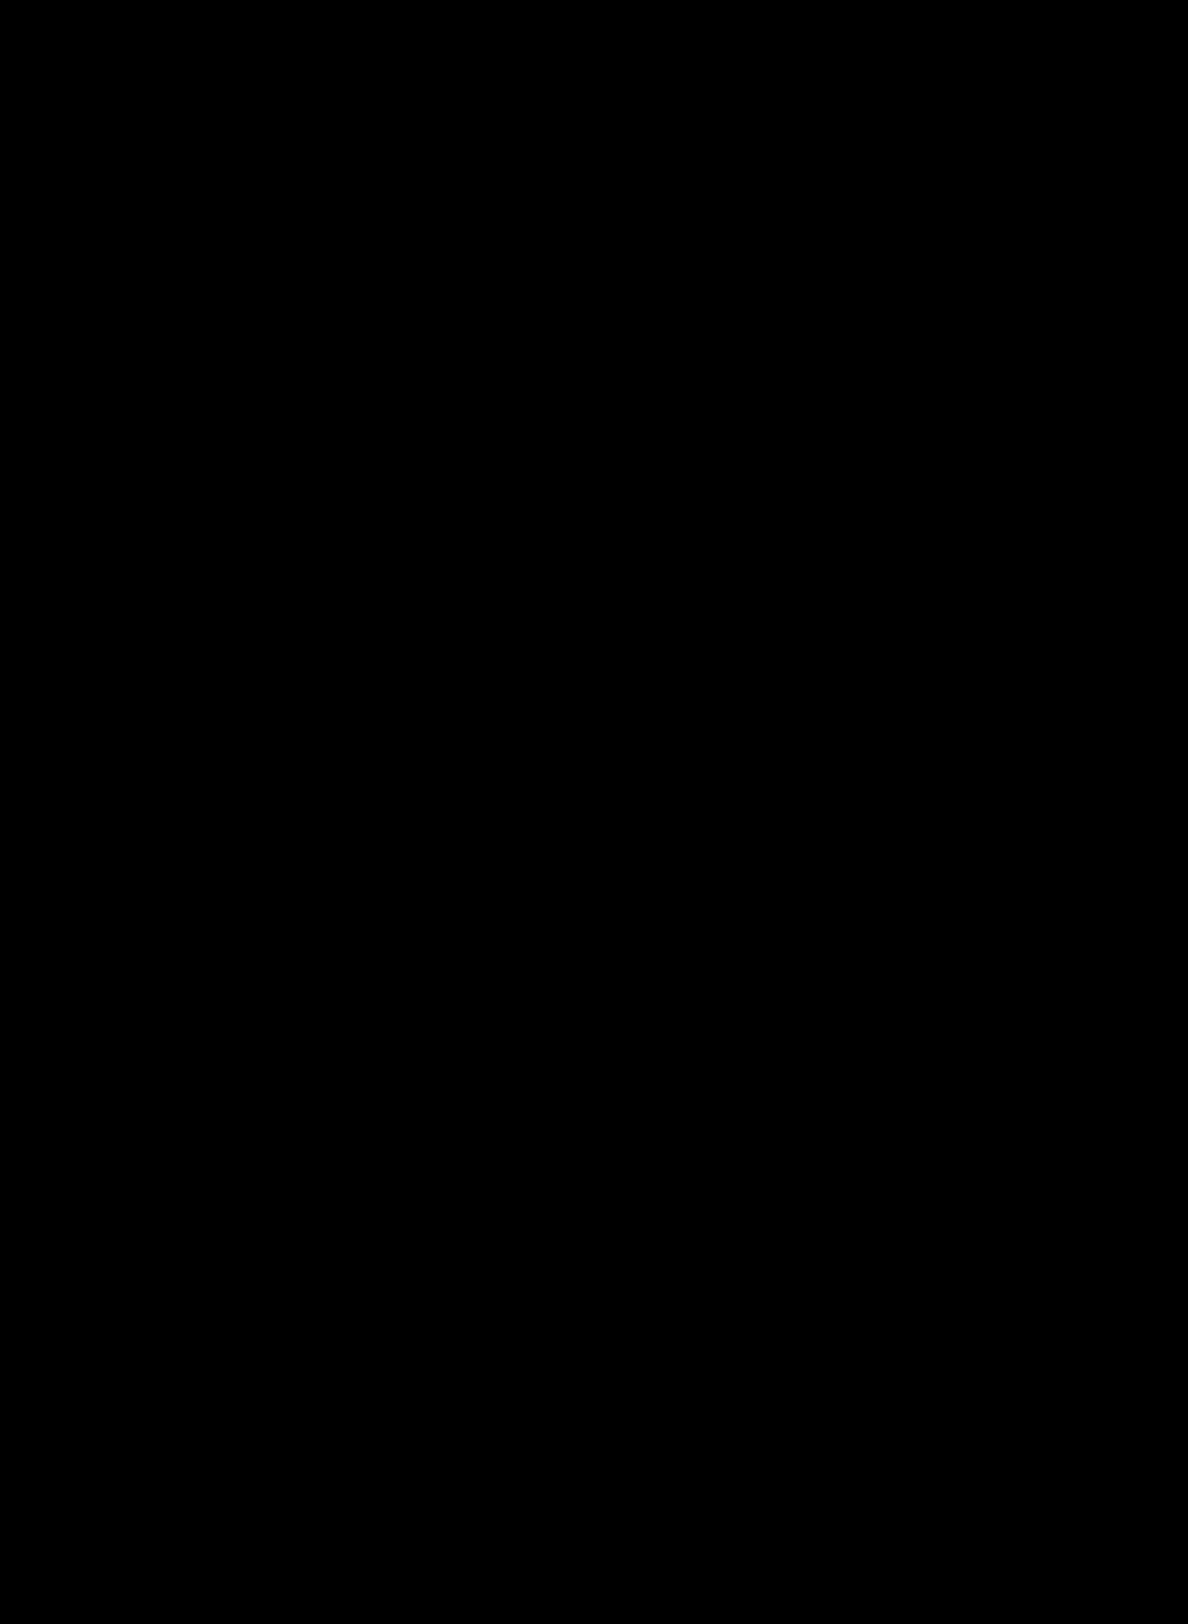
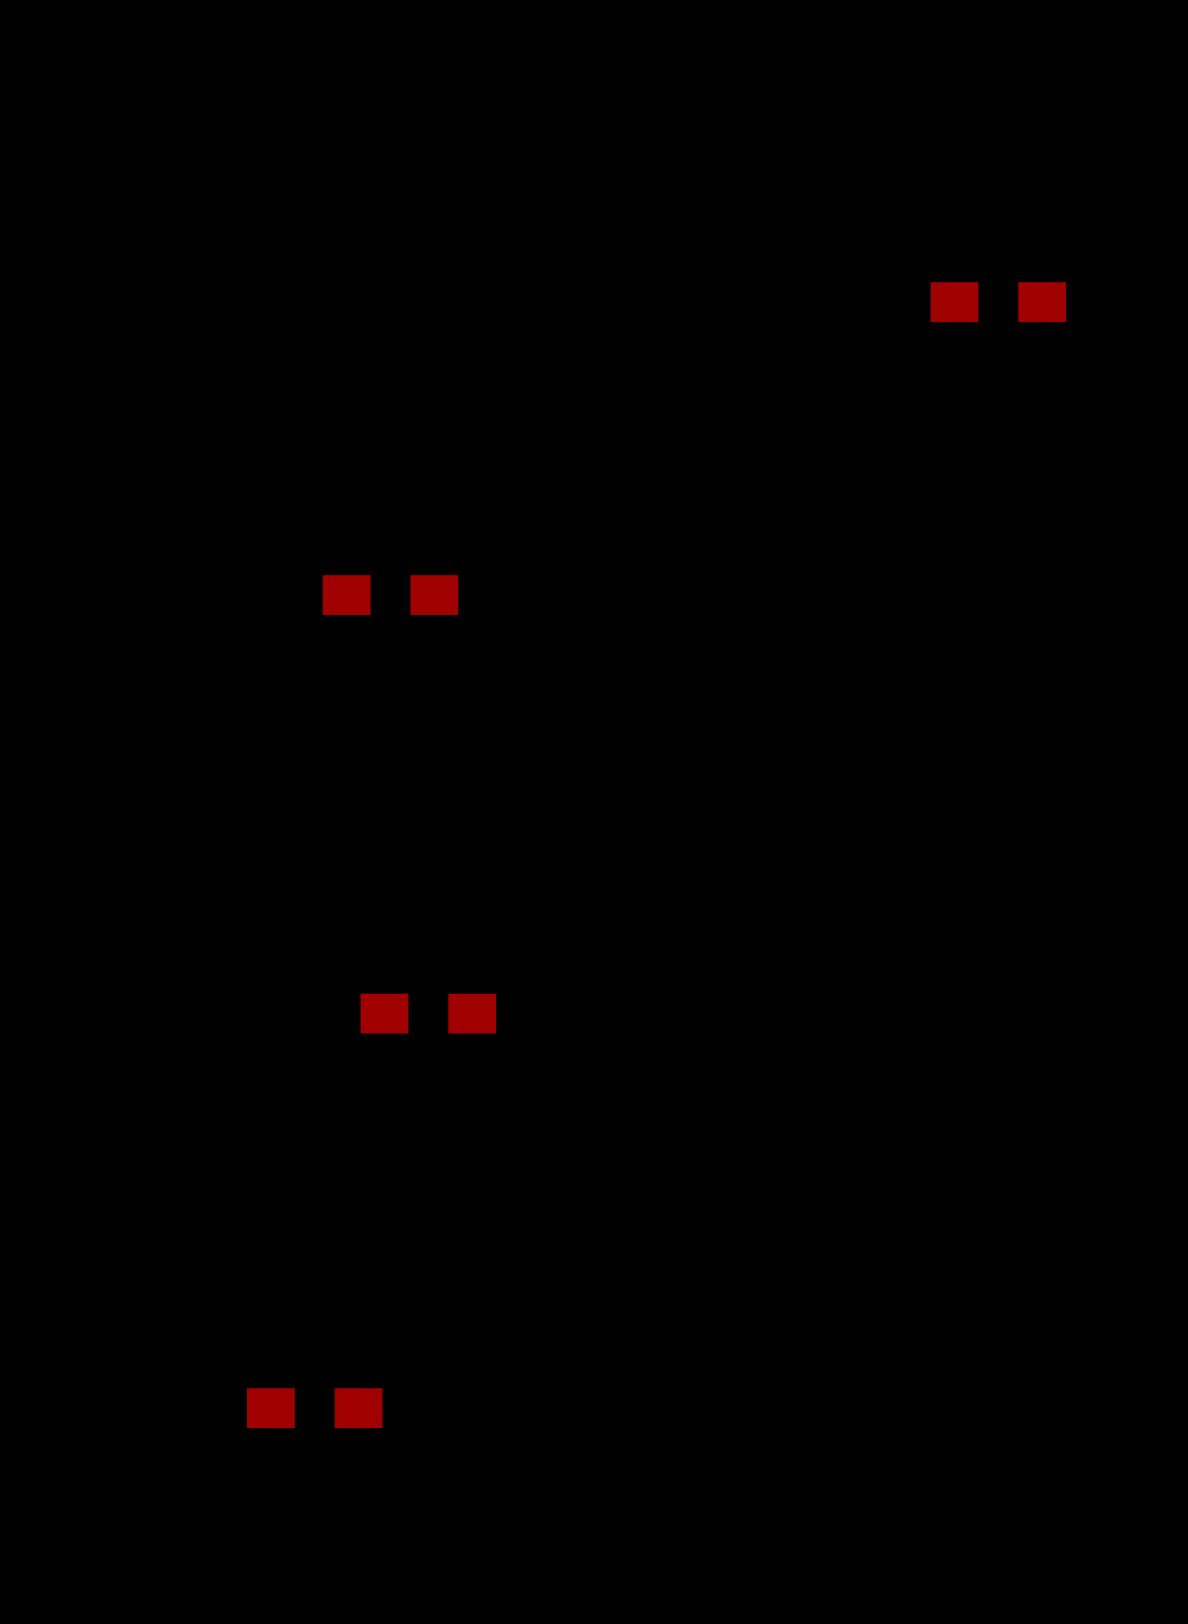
part: none -> (998, 302)
part: none -> (390, 595)
part: none -> (428, 1013)
part: none -> (314, 1408)

